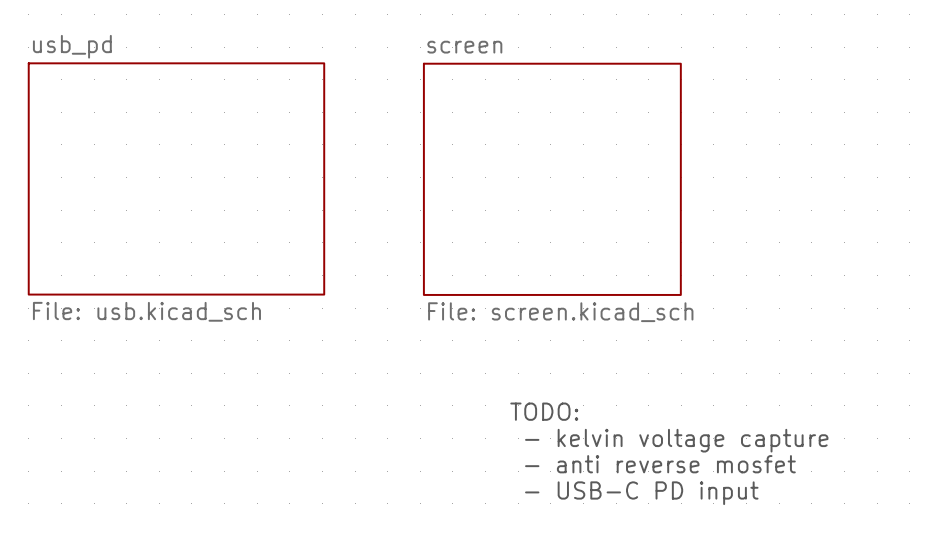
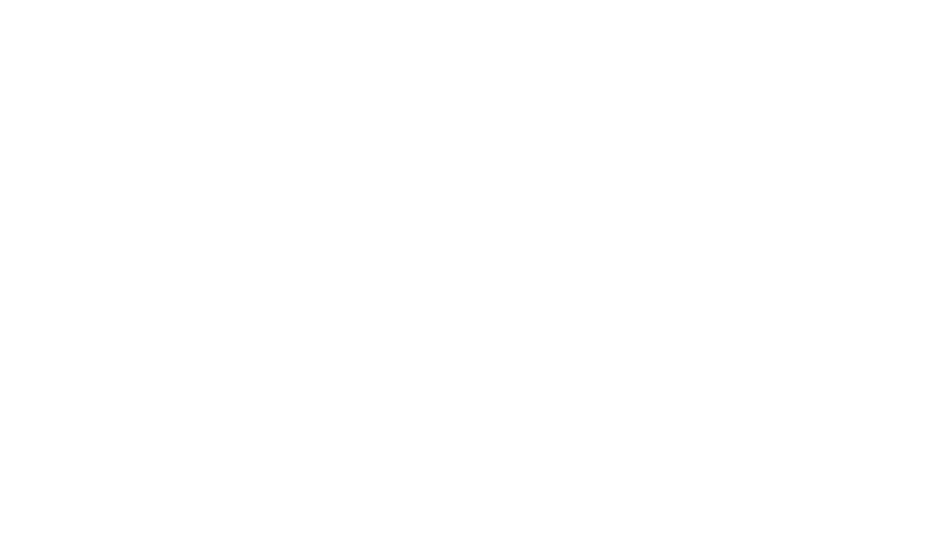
sheet usb_pd: File: usb.kicad_sch (176, 178) -> none
sheet screen: File: screen.kicad_sch (552, 179) -> none
text: TODO: (544, 411) -> none
text: - kelvin voltage capture (676, 440) -> none
text: - anti reverse mosfet (660, 464) -> none
text: - USB-C PD input (641, 493) -> none

